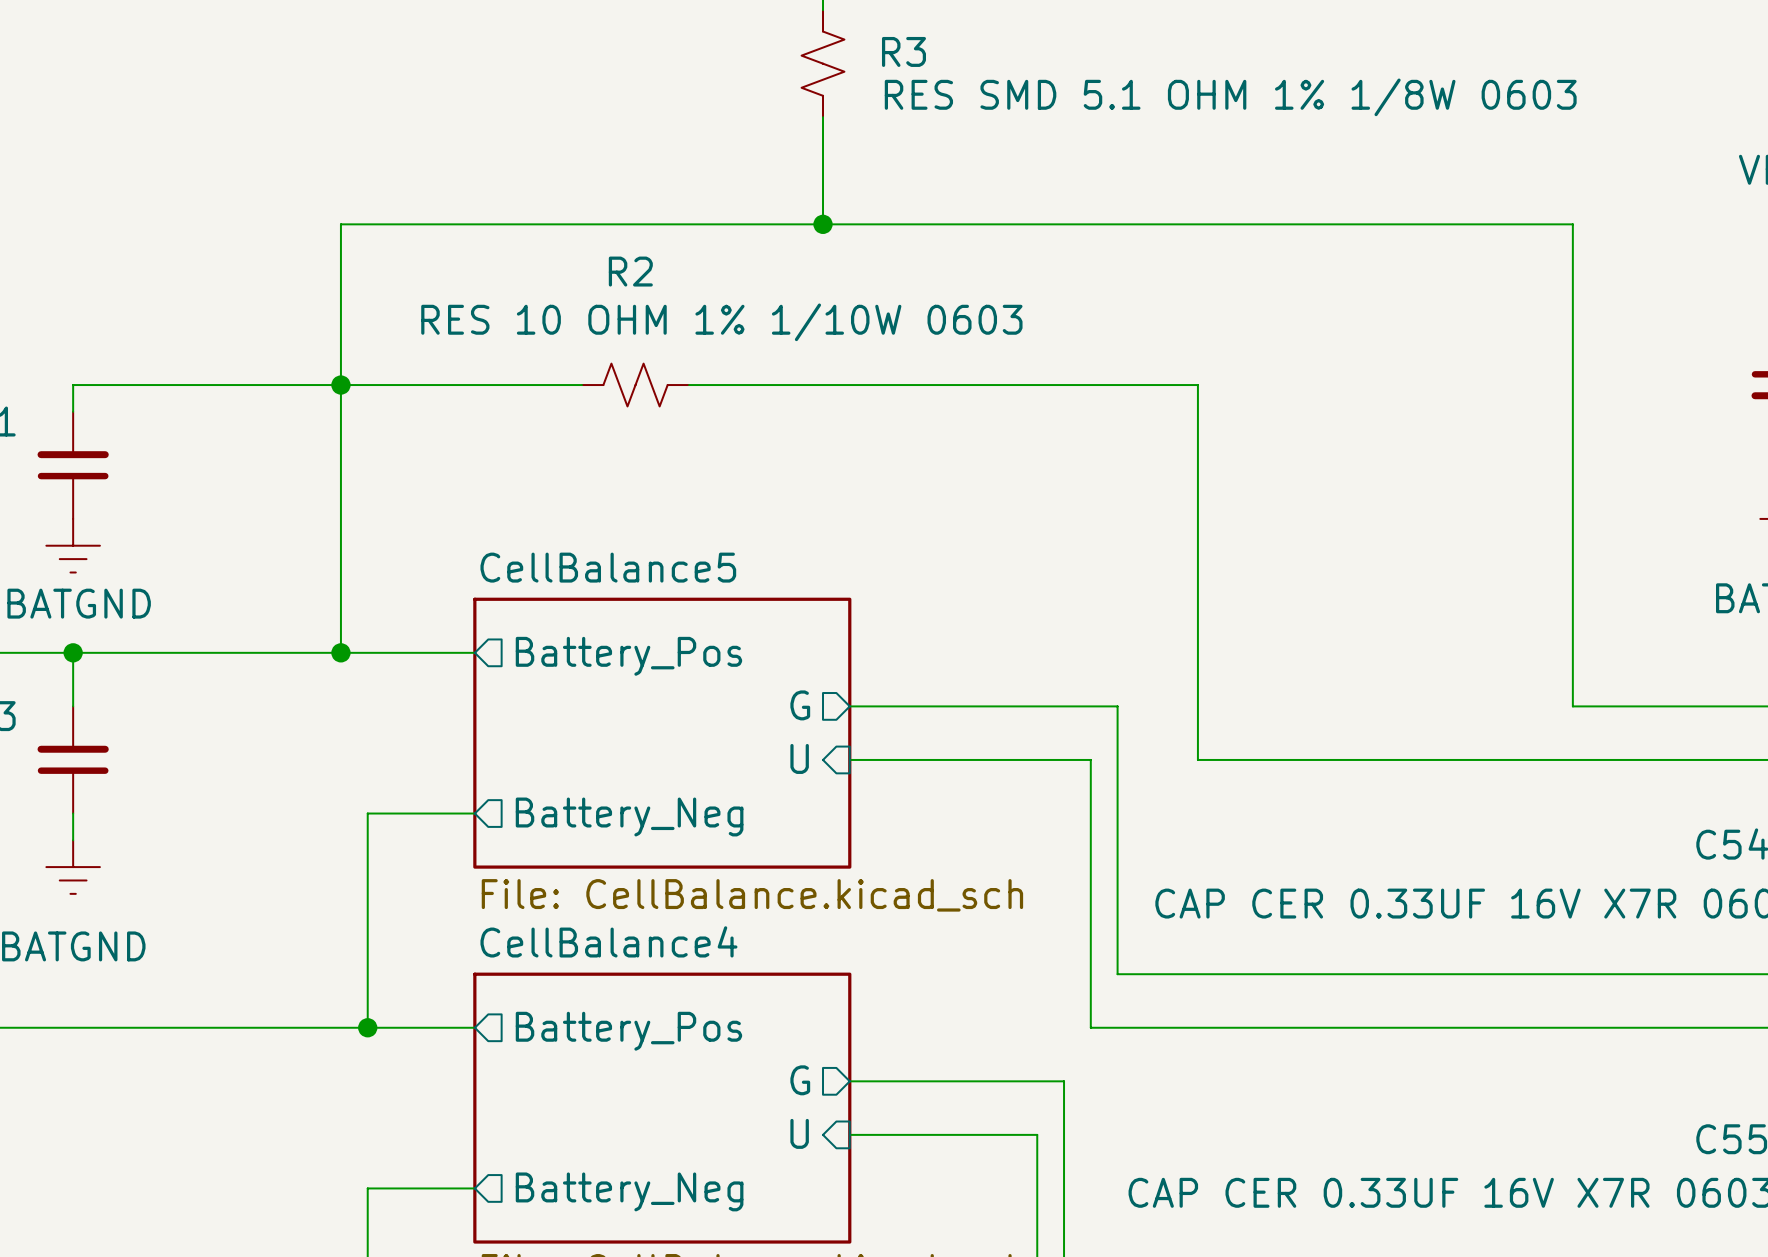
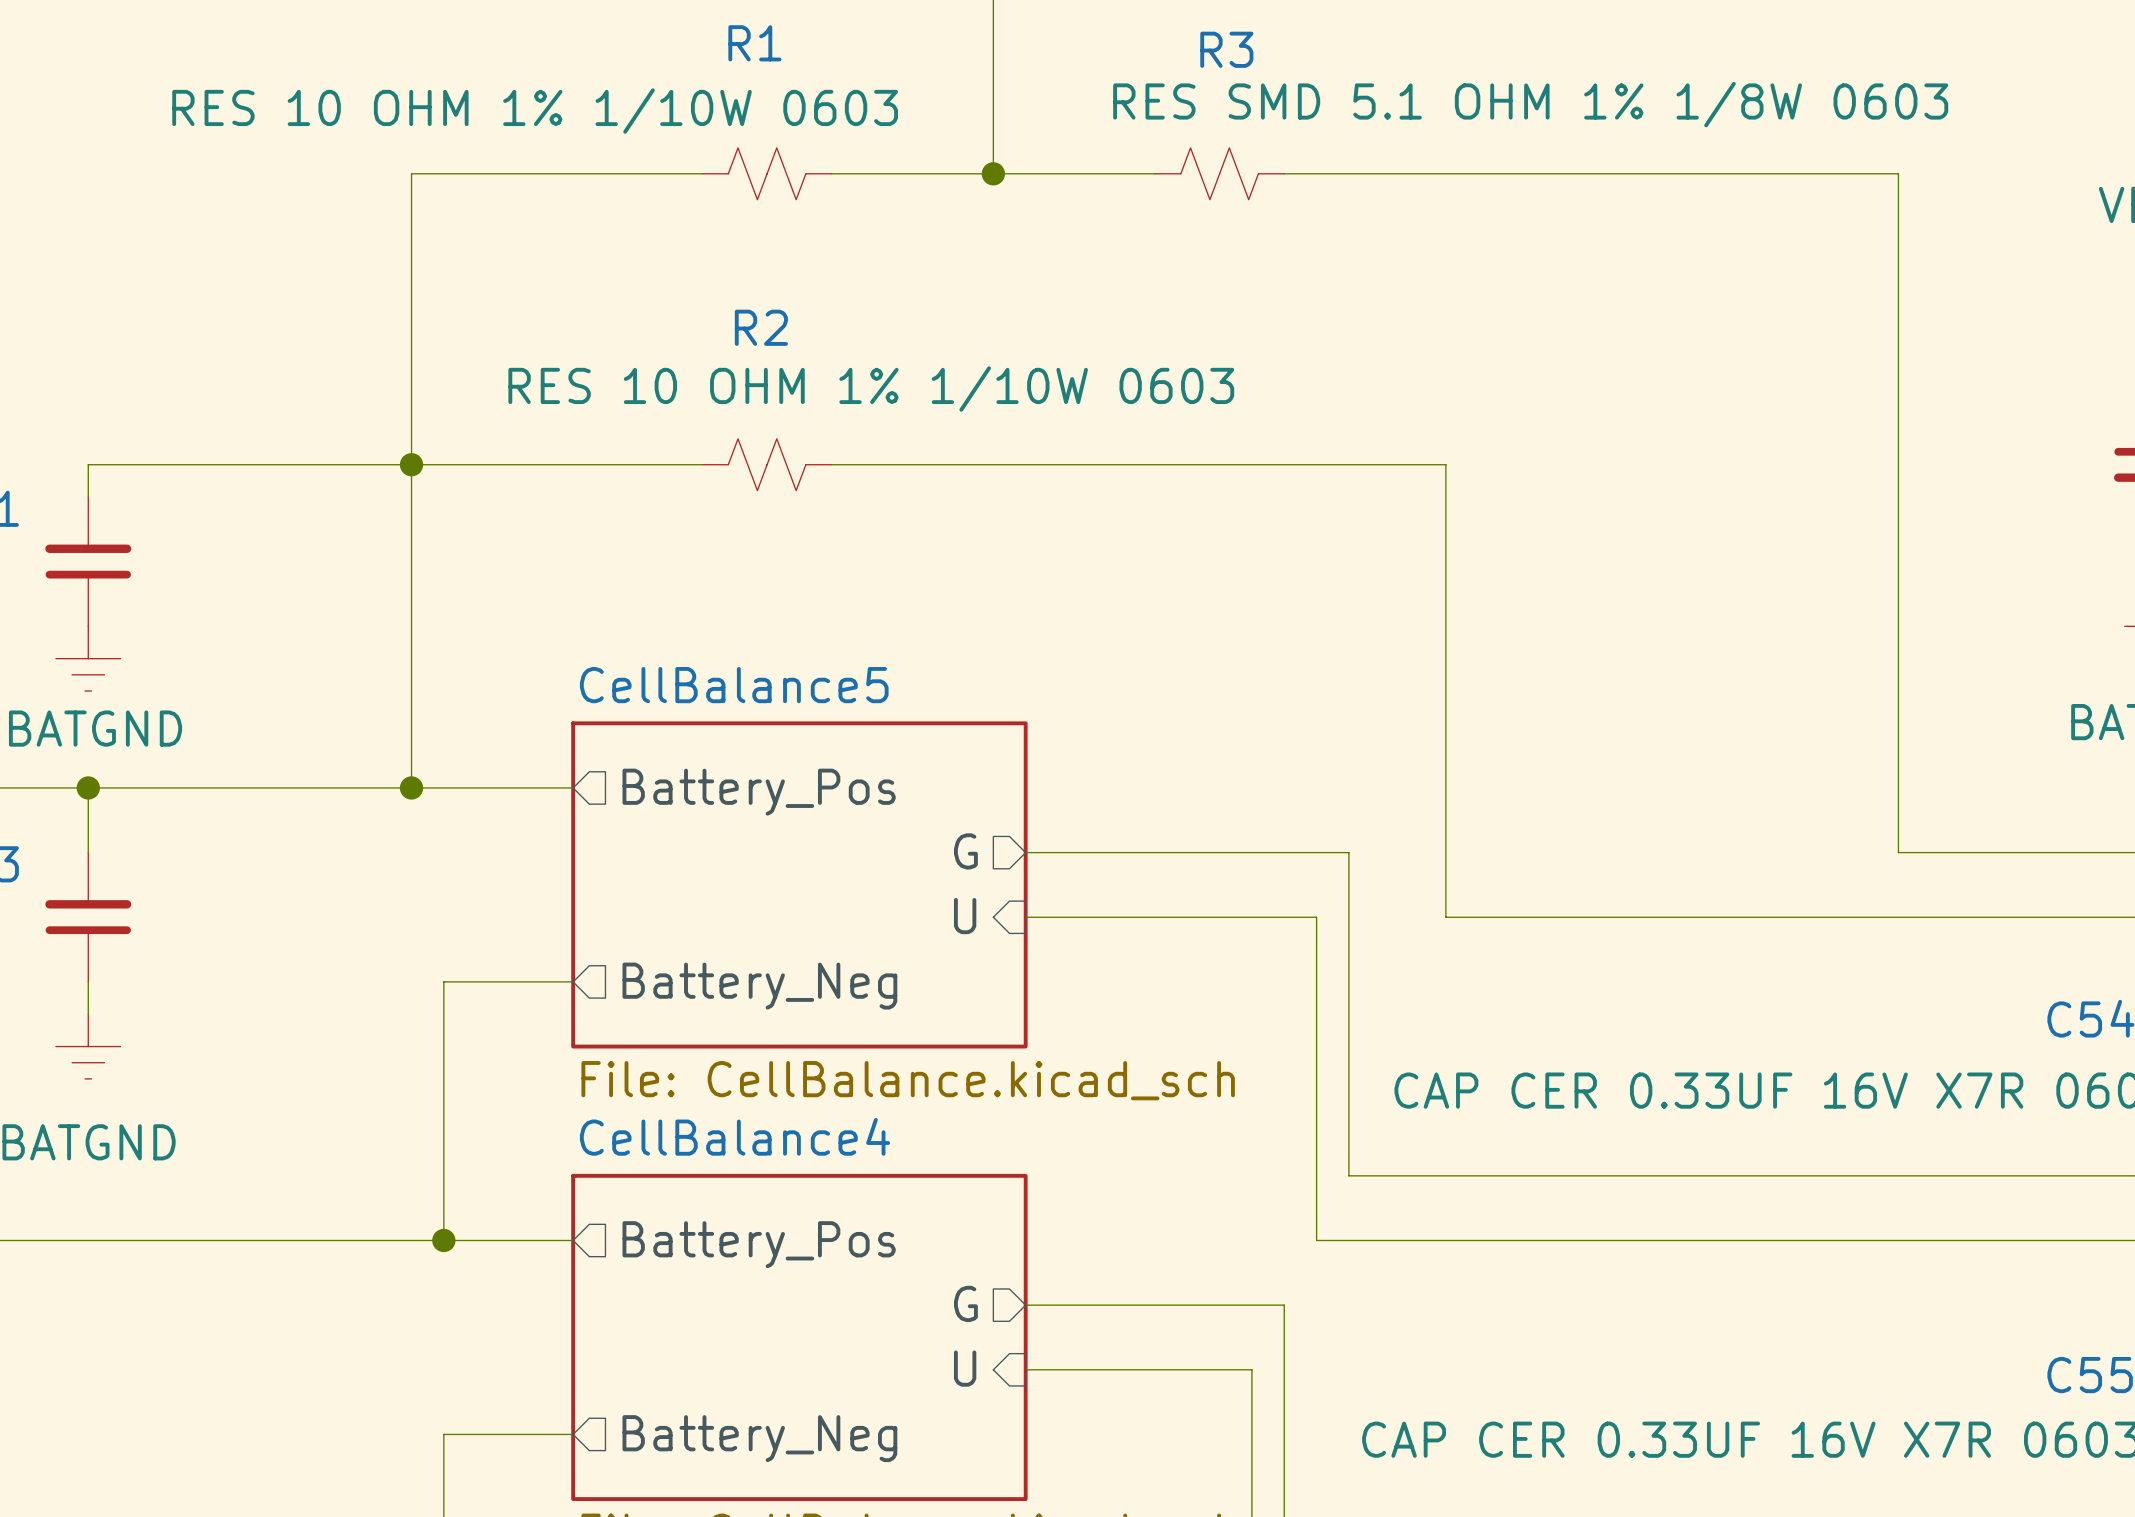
wire: none -> (993, 12) (993, 141)
R3 name position: R3 (903, 51) -> R3 (1226, 49)
R3 rotation: 0° (823, 63) -> 90° clockwise (1219, 173)
R3 position: (823, 63) -> (1219, 173)
R3 value position: RES SMD 5.1 OHM 1% 1/8W 0603 (1230, 97) -> RES SMD 5.1 OHM 1% 1/8W 0603 (1530, 104)
wire: none -> (702, 173) (411, 173) (411, 270)
R1: none -> RES 10 OHM 1% 1/10W 0603 (767, 173)
wire: none -> (831, 173) (1154, 173)
wire: (823, 144) (823, 224) -> none
wire: (340, 224) (1572, 224) -> (1284, 173) (1898, 173) (1898, 270)
junction position: (823, 224) -> (993, 173)

